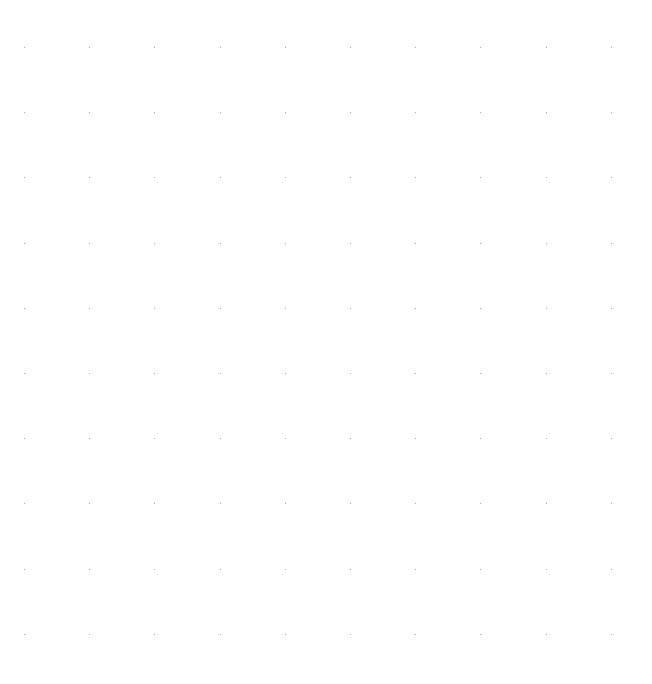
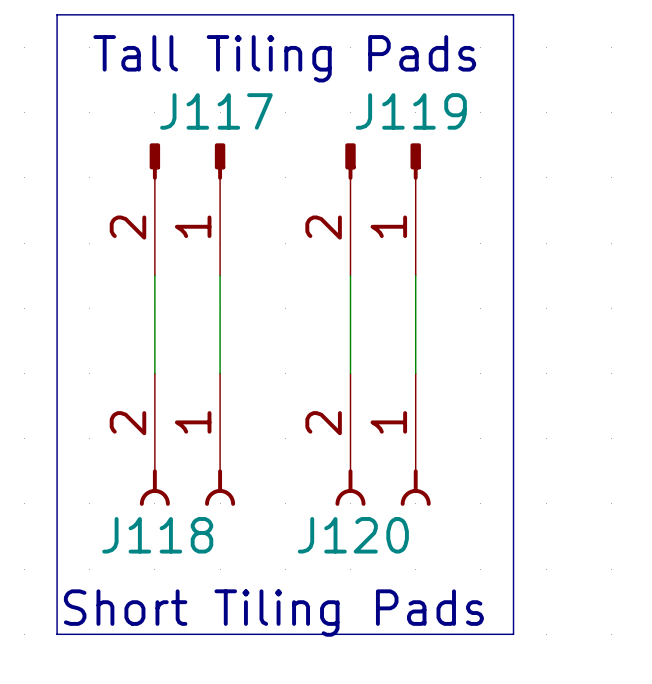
line: none -> (57, 14) (513, 14) (513, 634) (57, 634) (57, 14)
text: none -> Tall Tiling Pads (284, 58)
J117: none -> (187, 209)
J119: none -> (383, 209)
wire: none -> (154, 275) (154, 373)
wire: none -> (220, 275) (220, 373)
wire: none -> (350, 275) (350, 373)
wire: none -> (415, 275) (415, 373)
J118: none -> (187, 439)
J120: none -> (383, 439)
text: none -> Short Tiling Pads (273, 613)

